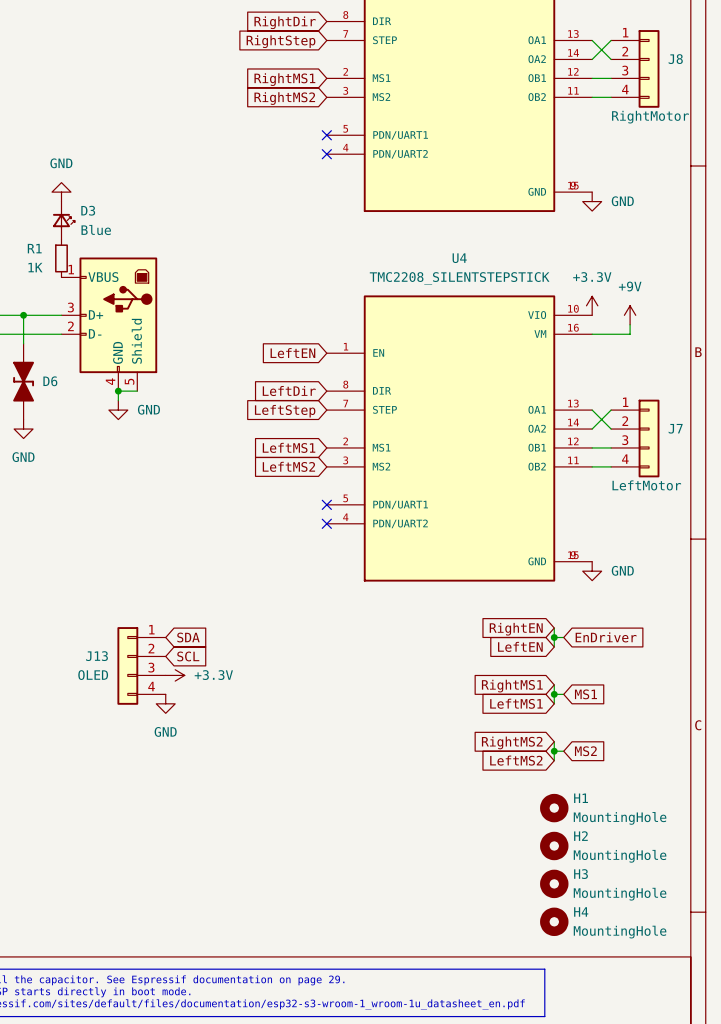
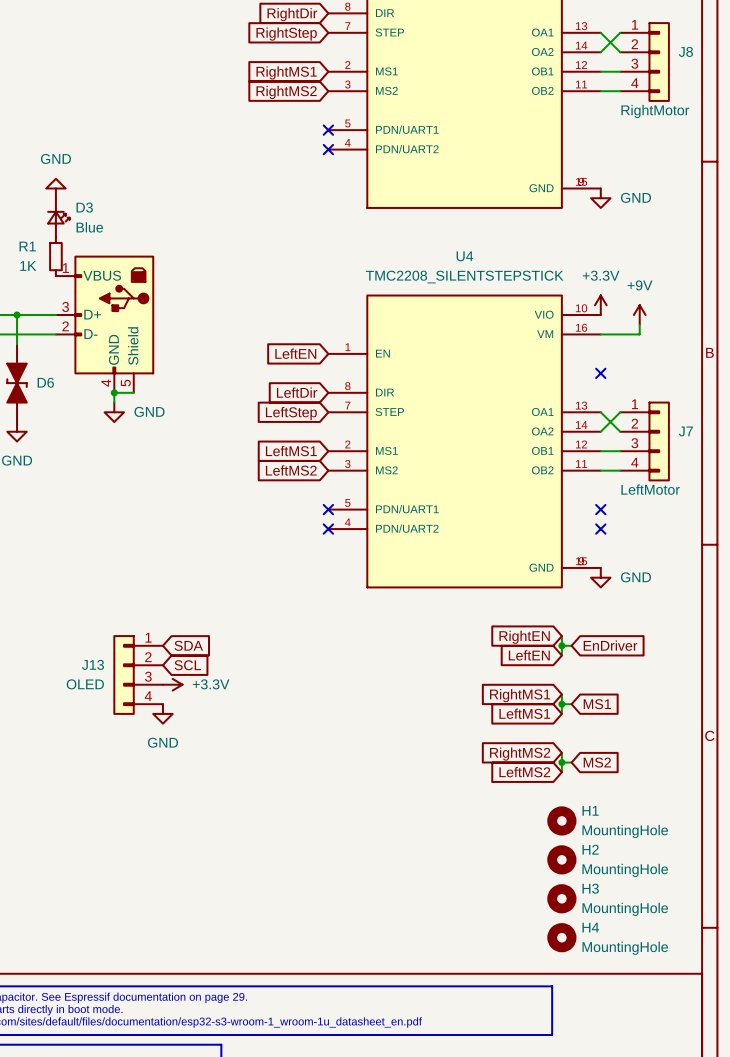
no-connect mark: none -> (600, 373)
no-connect mark: none -> (600, 509)
no-connect mark: none -> (600, 529)

